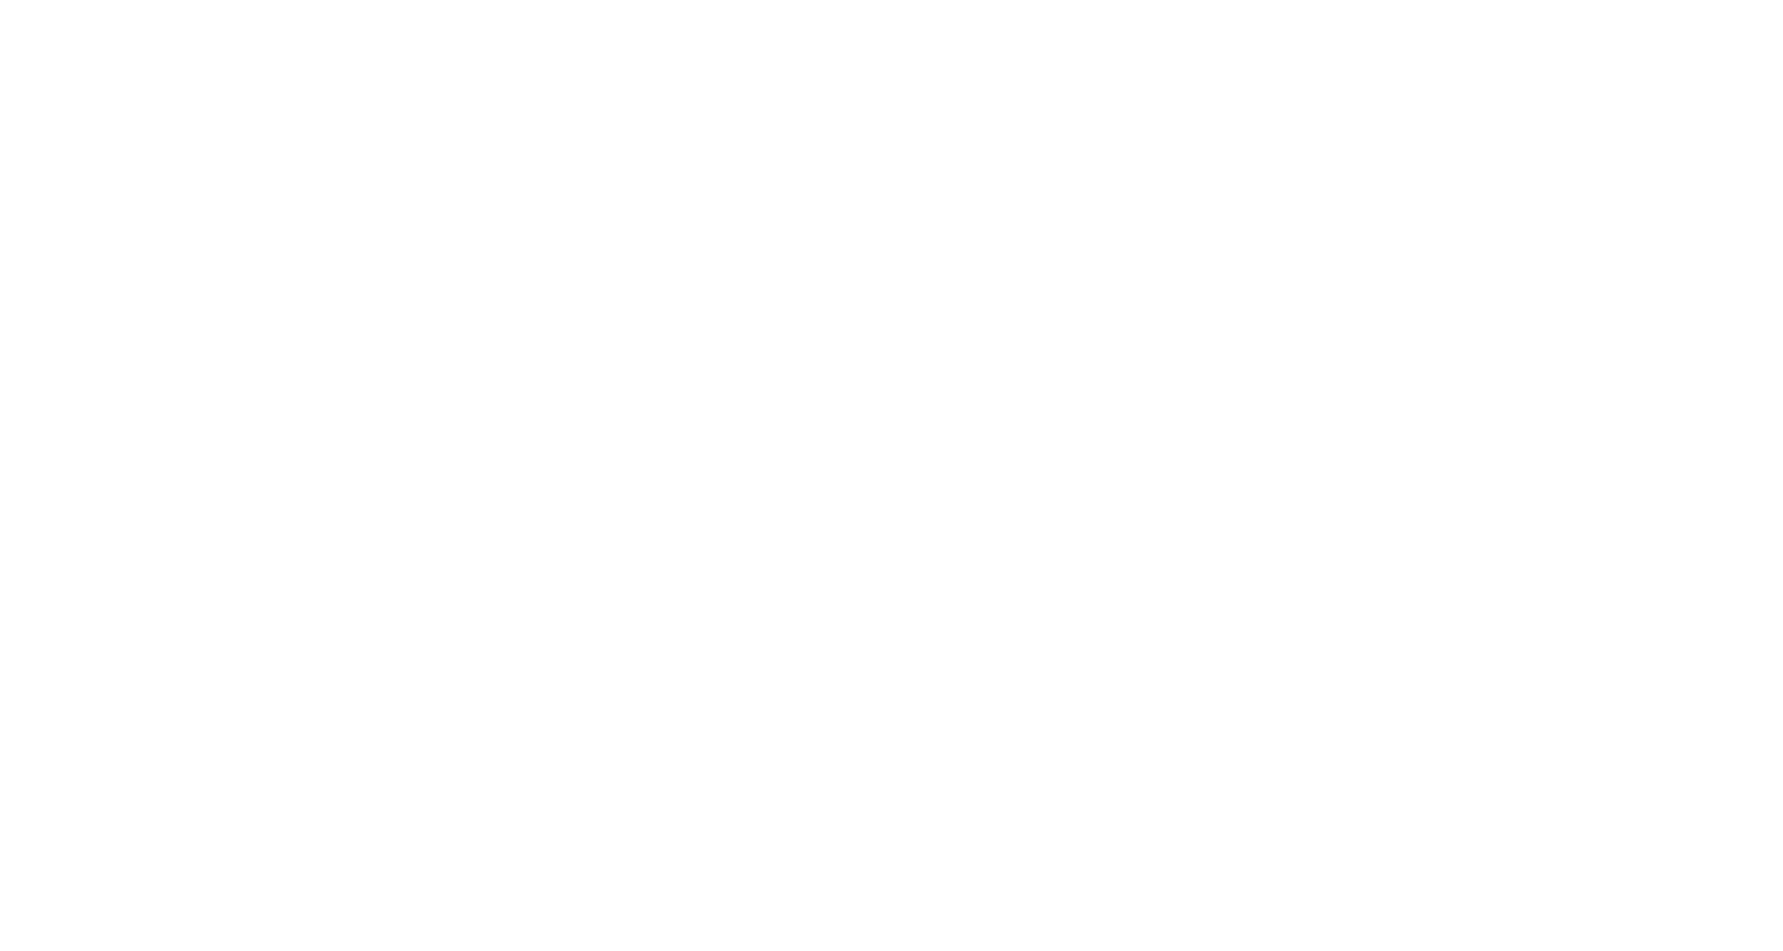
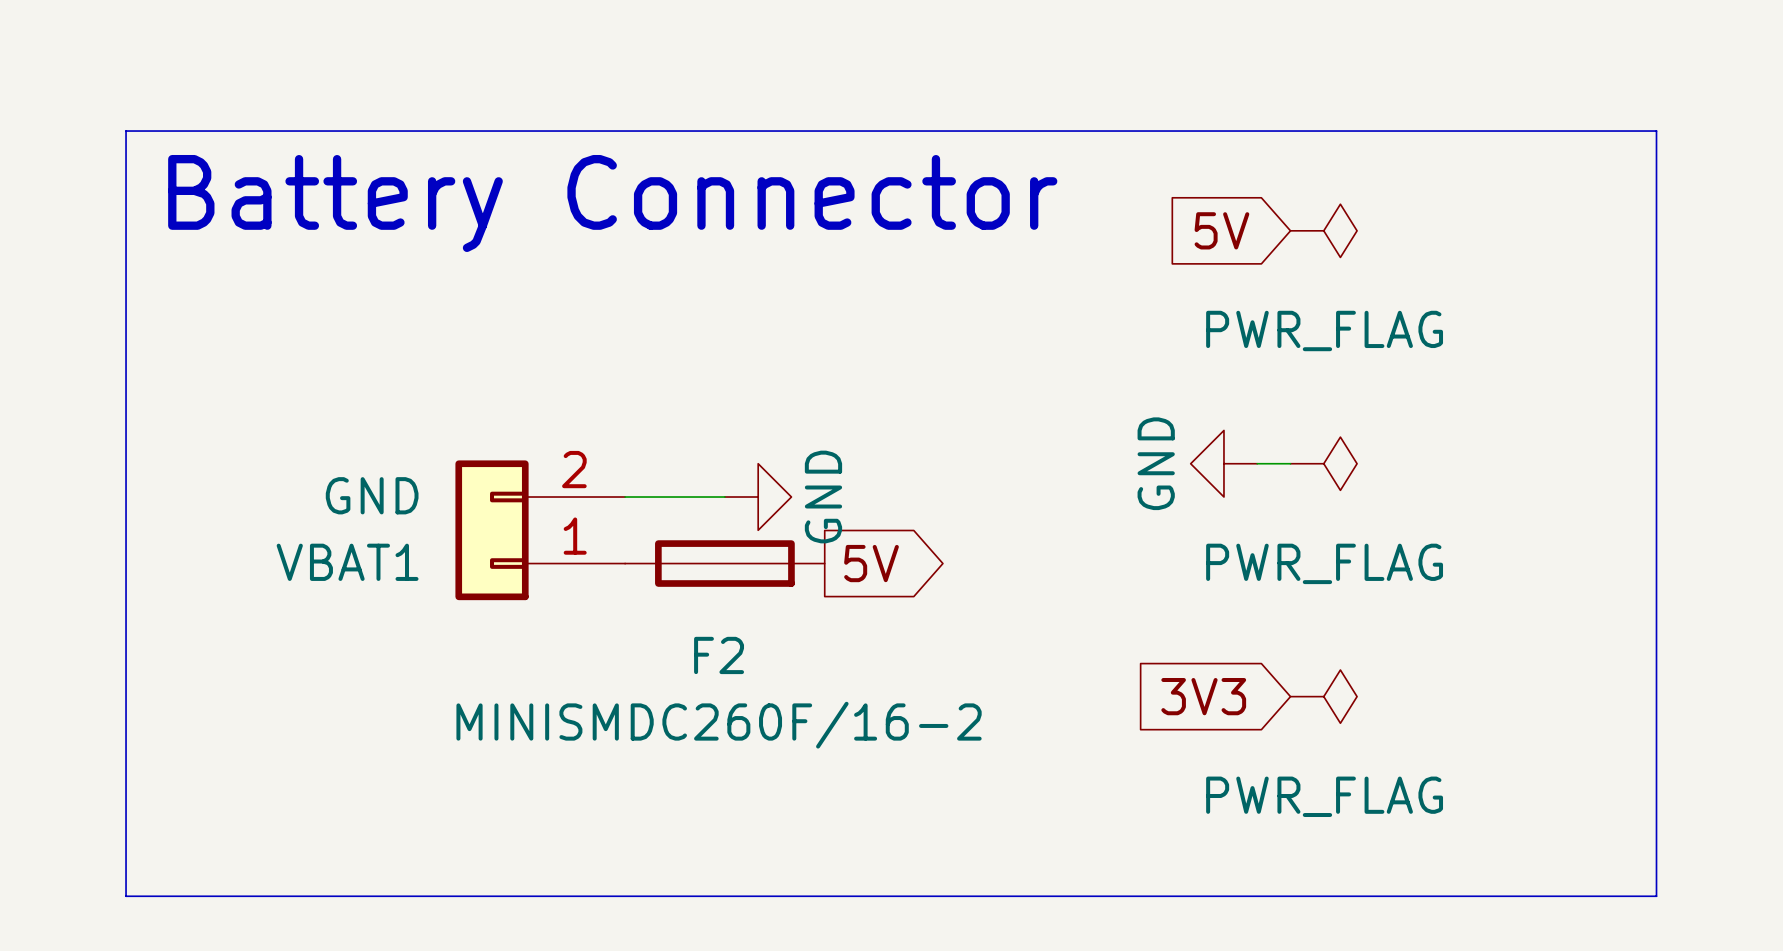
line: none -> (126, 131) (1656, 131) (1656, 896) (126, 896) (126, 131)
text: none -> Battery Connector (612, 203)
global label: none -> 5V (1221, 230)
power symbol: none -> PWR_FLAG (1323, 230)
power symbol: none -> GND (1223, 463)
wire: none -> (1257, 463) (1290, 463)
power symbol: none -> PWR_FLAG (1323, 463)
wire: none -> (625, 497) (724, 497)
power symbol: none -> GND (758, 497)
VBAT1: none -> GND (540, 530)
F2: none -> MINISMDC260F/16-2 (724, 563)
global label: none -> 5V (871, 563)
global label: none -> 3V3 (1203, 696)
power symbol: none -> PWR_FLAG (1323, 696)

